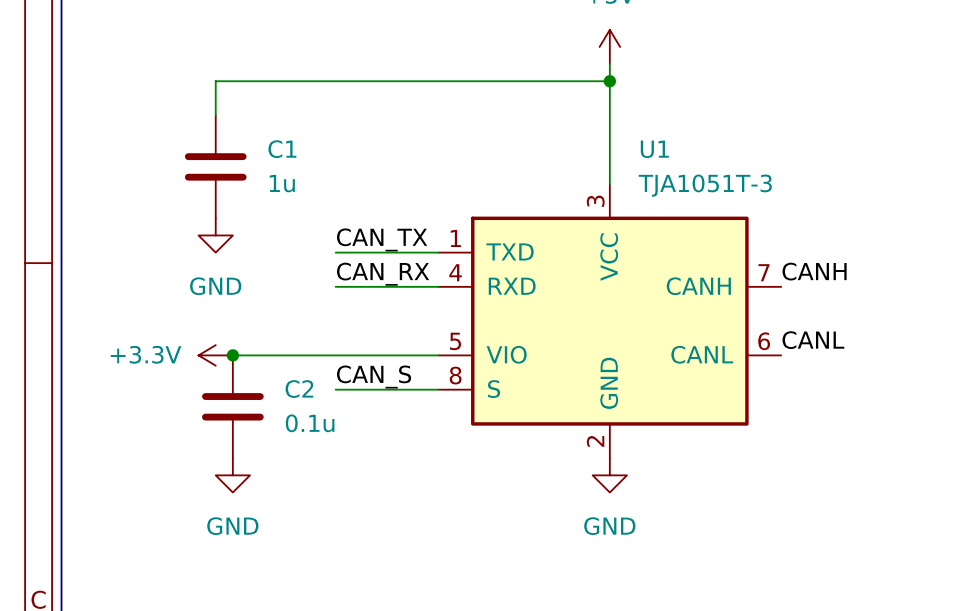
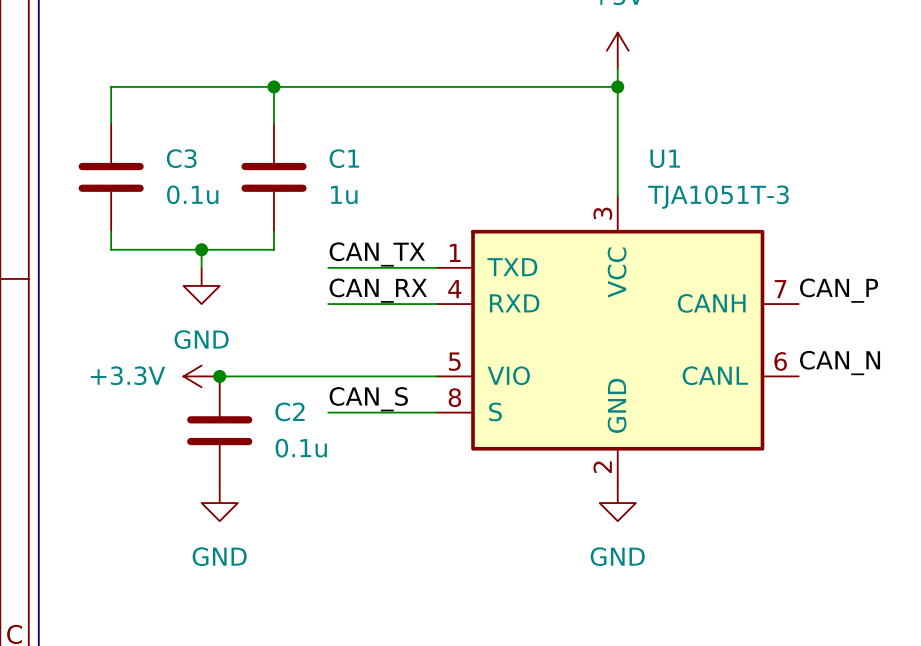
wire: (215, 81) (215, 115) -> (201, 86) (111, 86) (111, 123)
wire: none -> (273, 86) (273, 123)
junction: none -> (273, 86)
C3: none -> 0.1u (111, 177)
C1 position: (215, 166) -> (273, 177)
wire: none -> (111, 231) (111, 249) (273, 249) (273, 231)
wire: none -> (201, 249) (201, 267)
power symbol position: GND (215, 235) -> GND (201, 285)
junction: none -> (201, 249)
label: CANH (814, 271) -> CAN_P (839, 290)
label: CANL (813, 340) -> CAN_N (840, 363)

